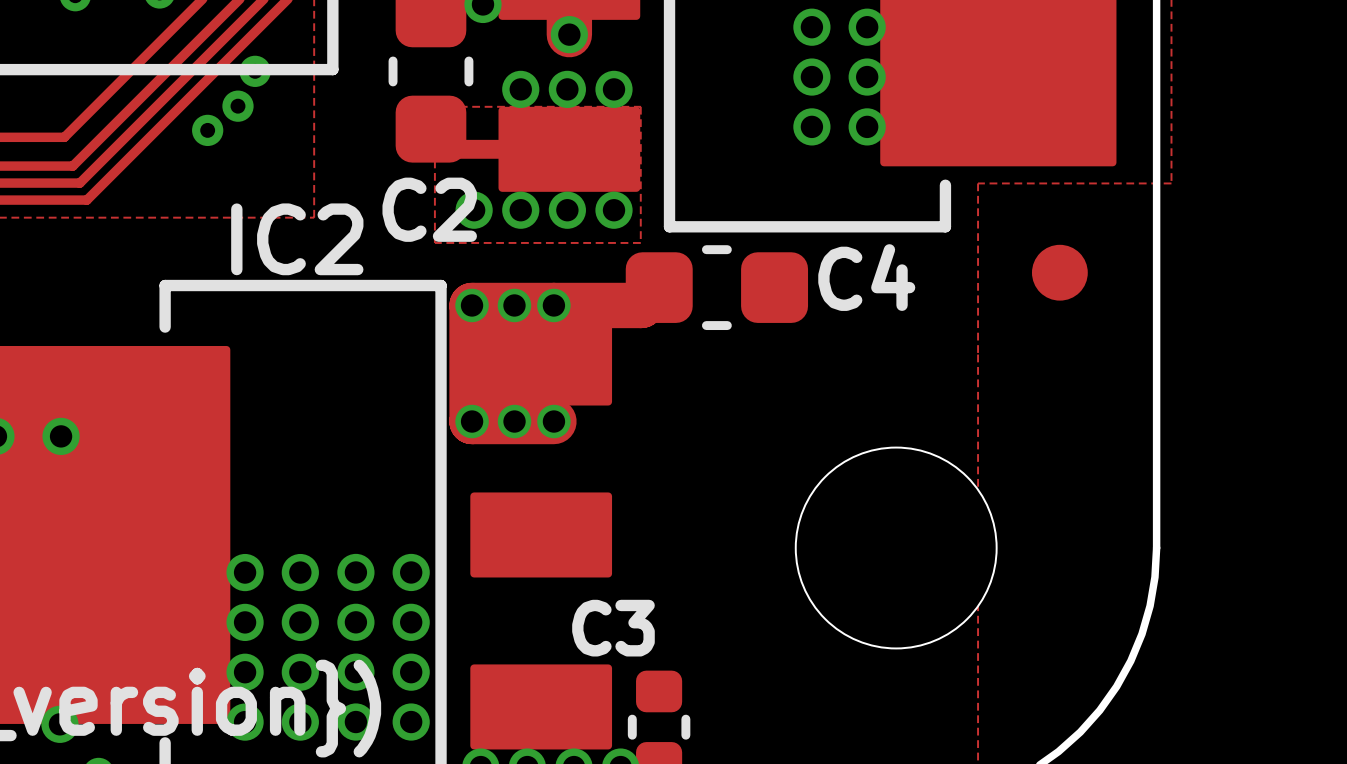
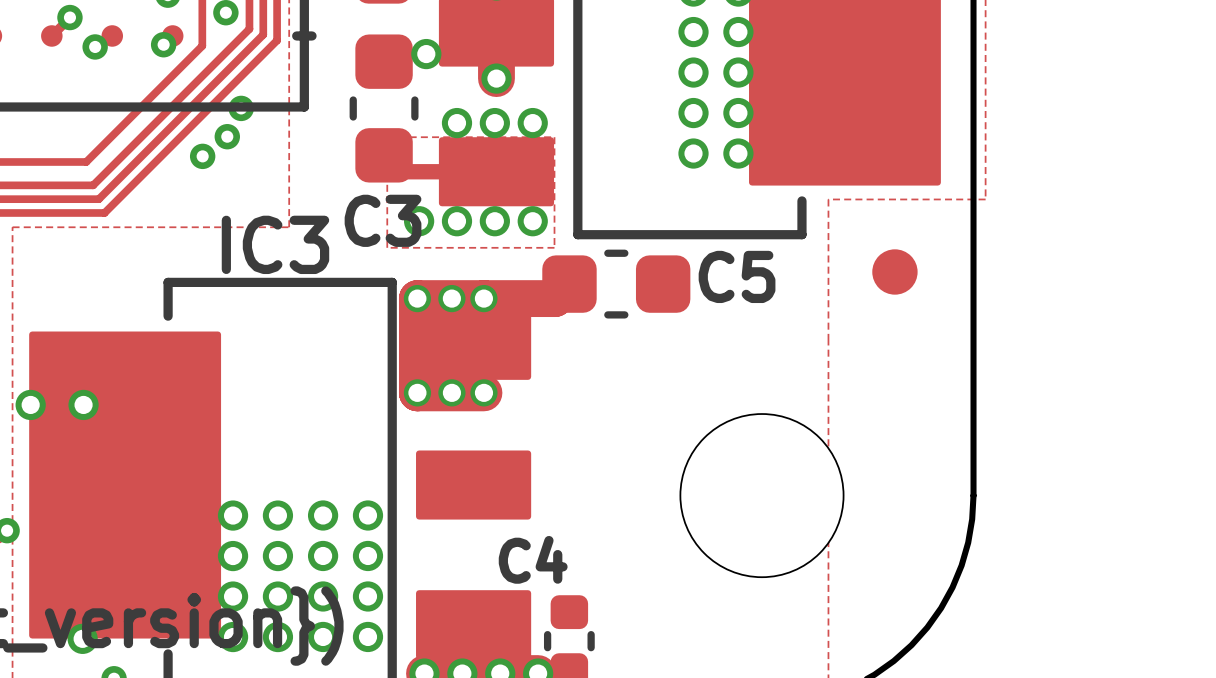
C2 name: C2 (429, 209) -> C3 (383, 220)
IC2 name: IC2 (297, 239) -> IC3 (275, 244)
C4 name: C4 (866, 277) -> C5 (737, 276)
C3 name: C3 (613, 628) -> C4 (533, 559)

